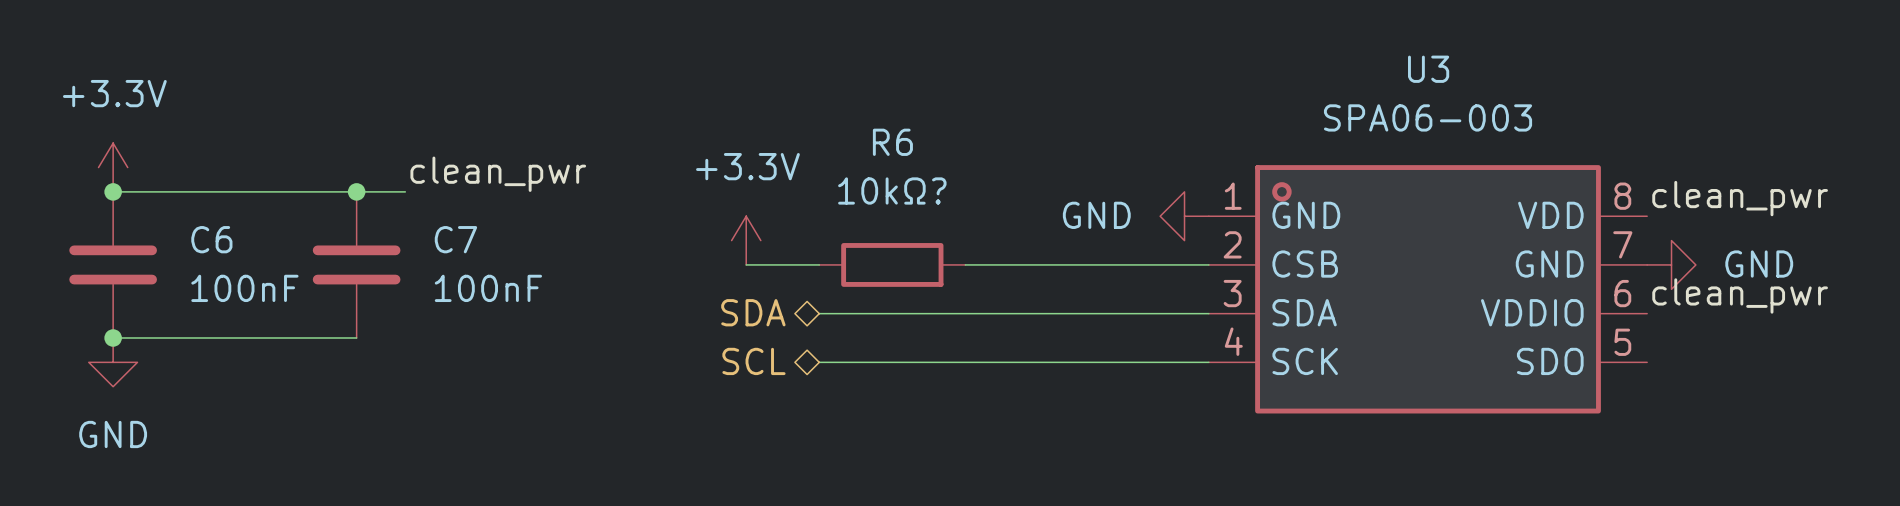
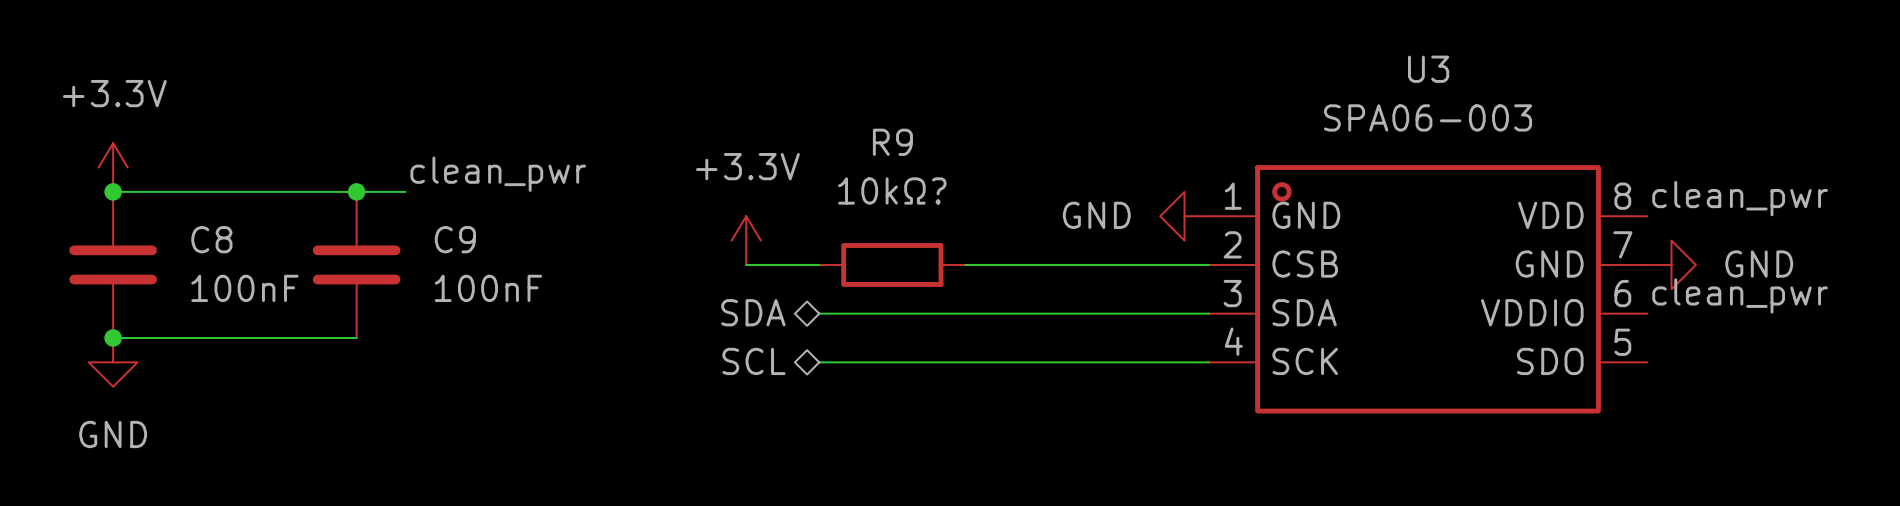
R6 name: R6 (892, 142) -> R9 (892, 142)
C6 name: C6 (211, 239) -> C8 (211, 239)
C7 name: C7 (455, 239) -> C9 (455, 239)

